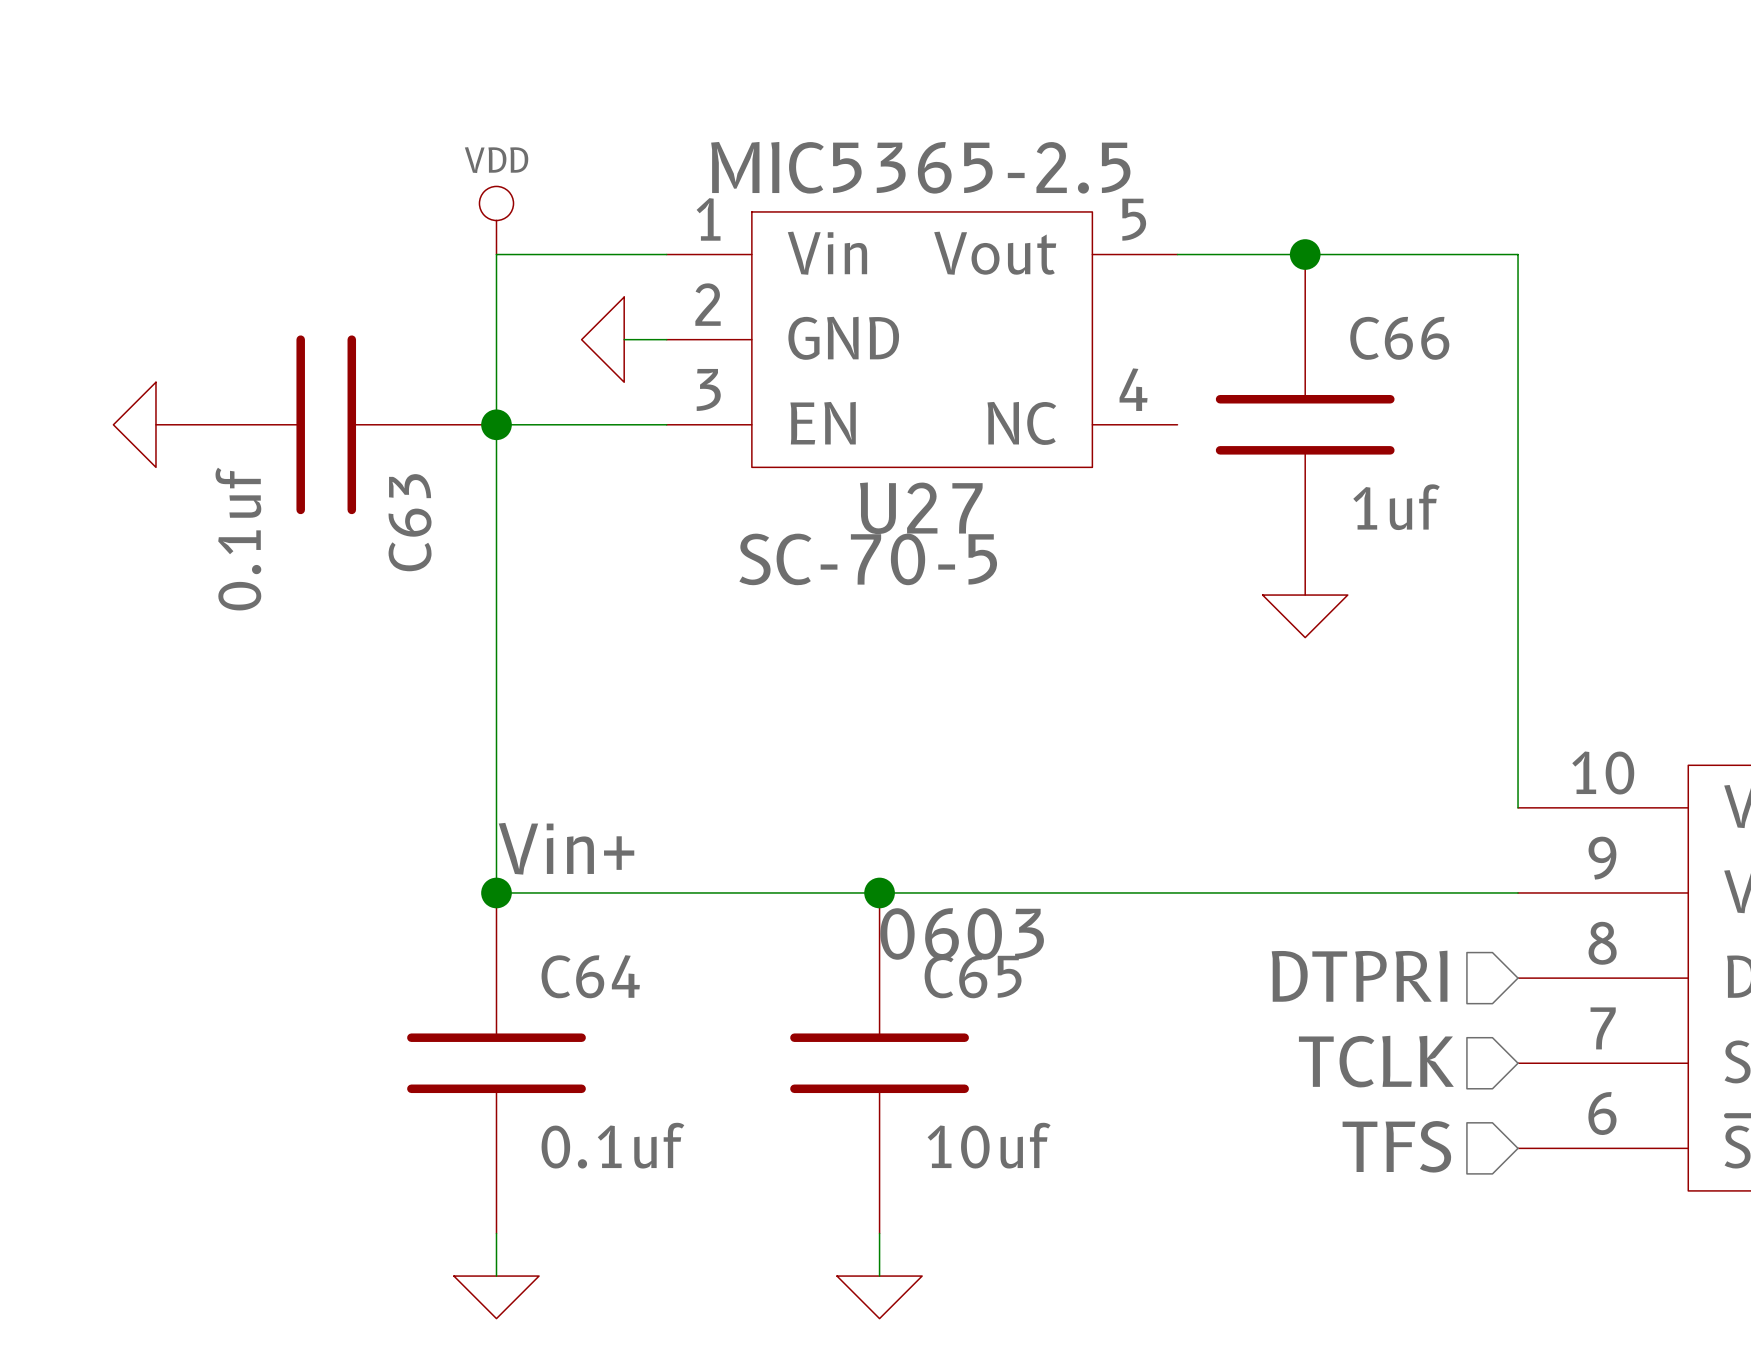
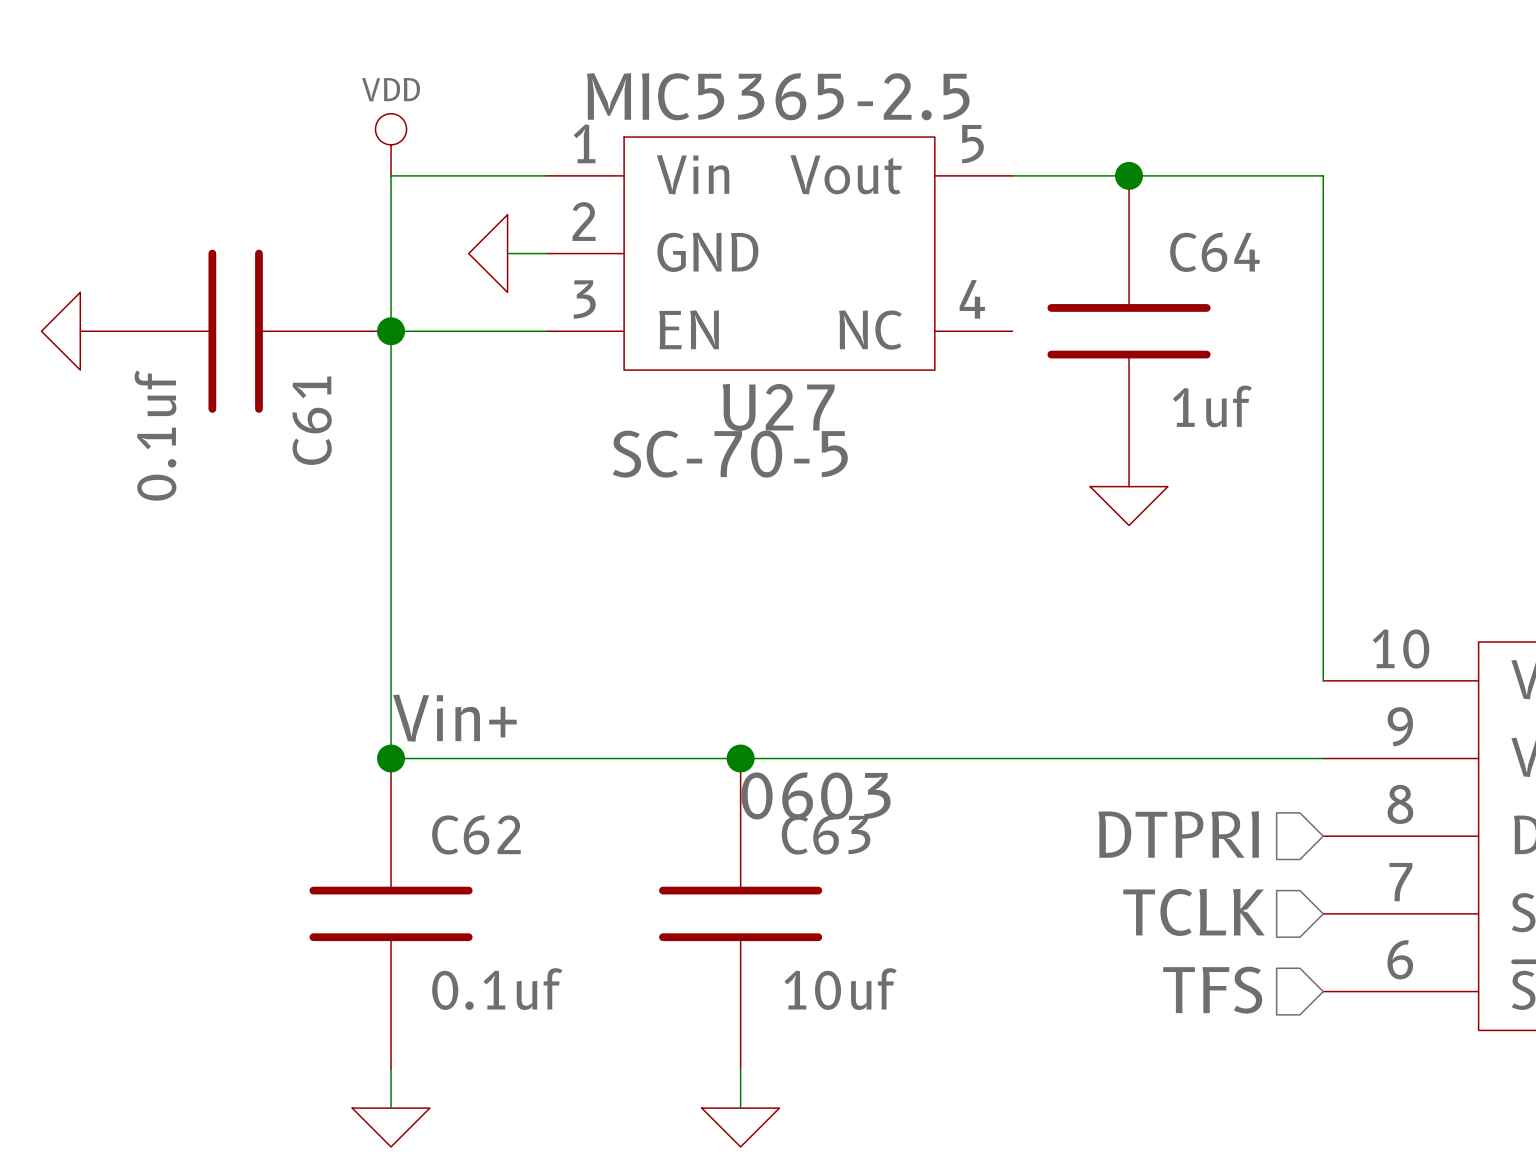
C66 name: C66 (1399, 338) -> C64 (1215, 252)
C63 name: C63 (410, 522) -> C61 (312, 420)
C64 name: C64 (590, 976) -> C62 (476, 835)
C65 name: C65 (973, 976) -> C63 (826, 835)

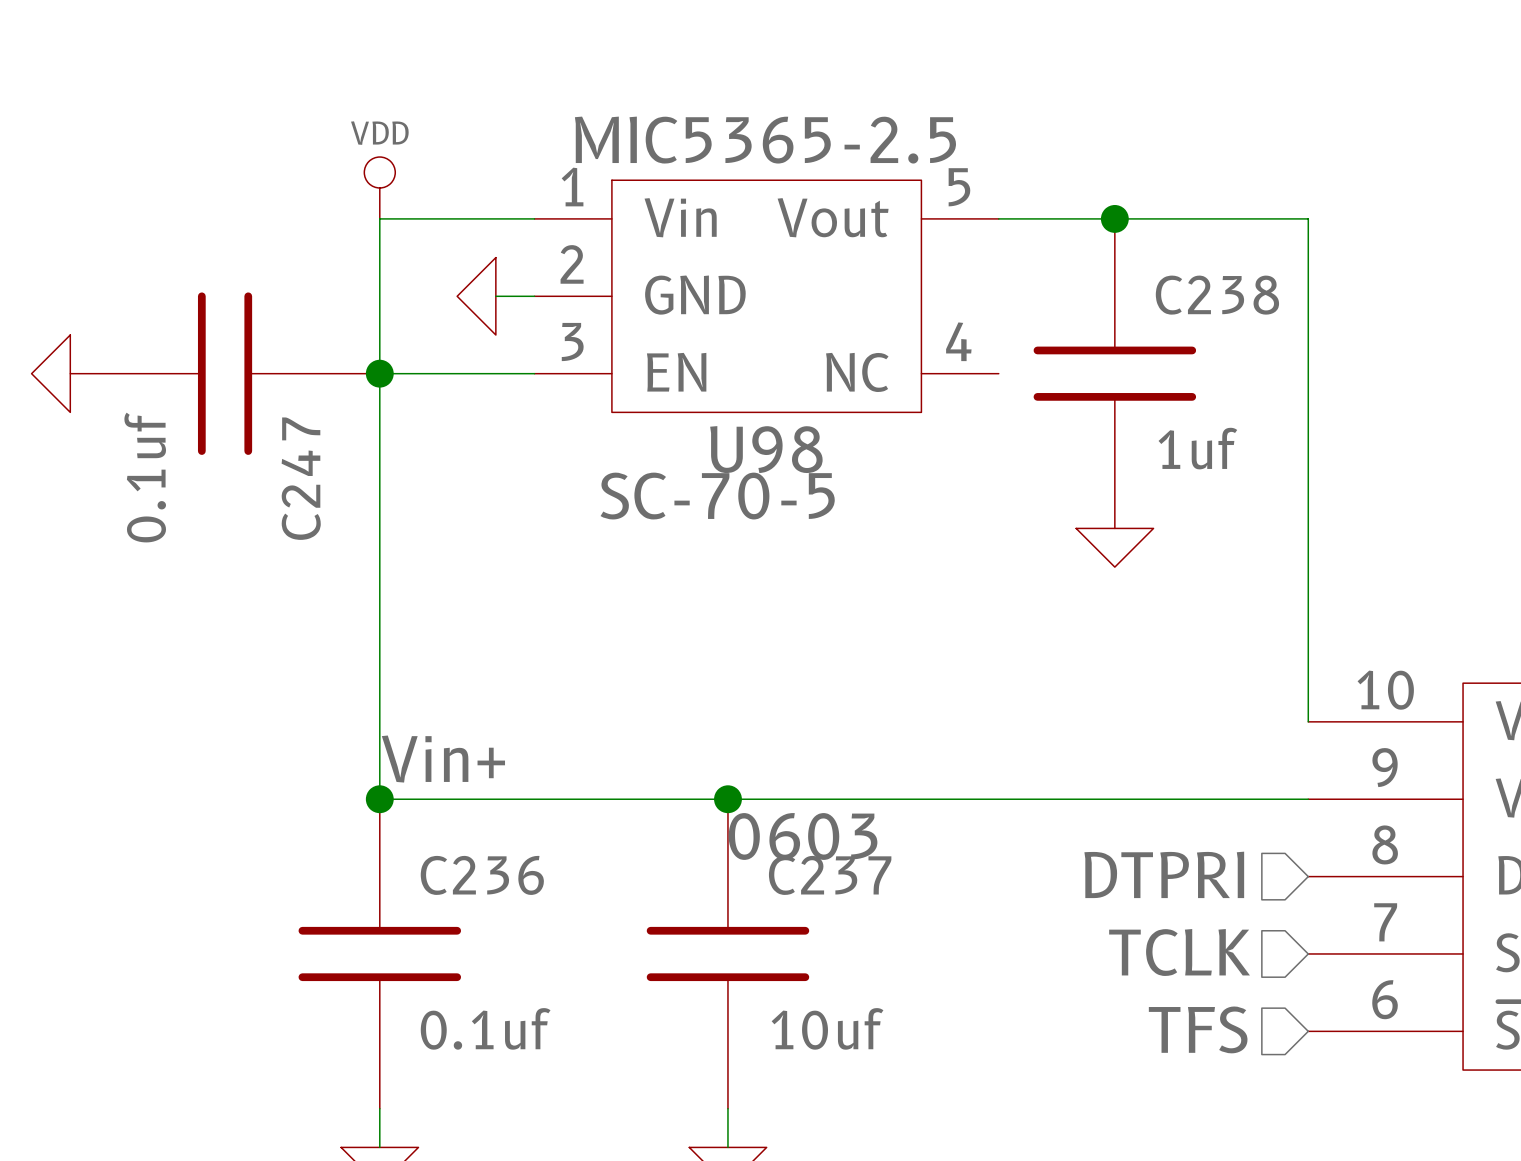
C64 name: C64 (1215, 252) -> C238 (1217, 295)
U27 name: U27 (778, 407) -> U98 (766, 449)
C61 name: C61 (312, 420) -> C247 (301, 478)
C62 name: C62 (476, 835) -> C236 (482, 875)
C63 name: C63 (826, 835) -> C237 (830, 875)

